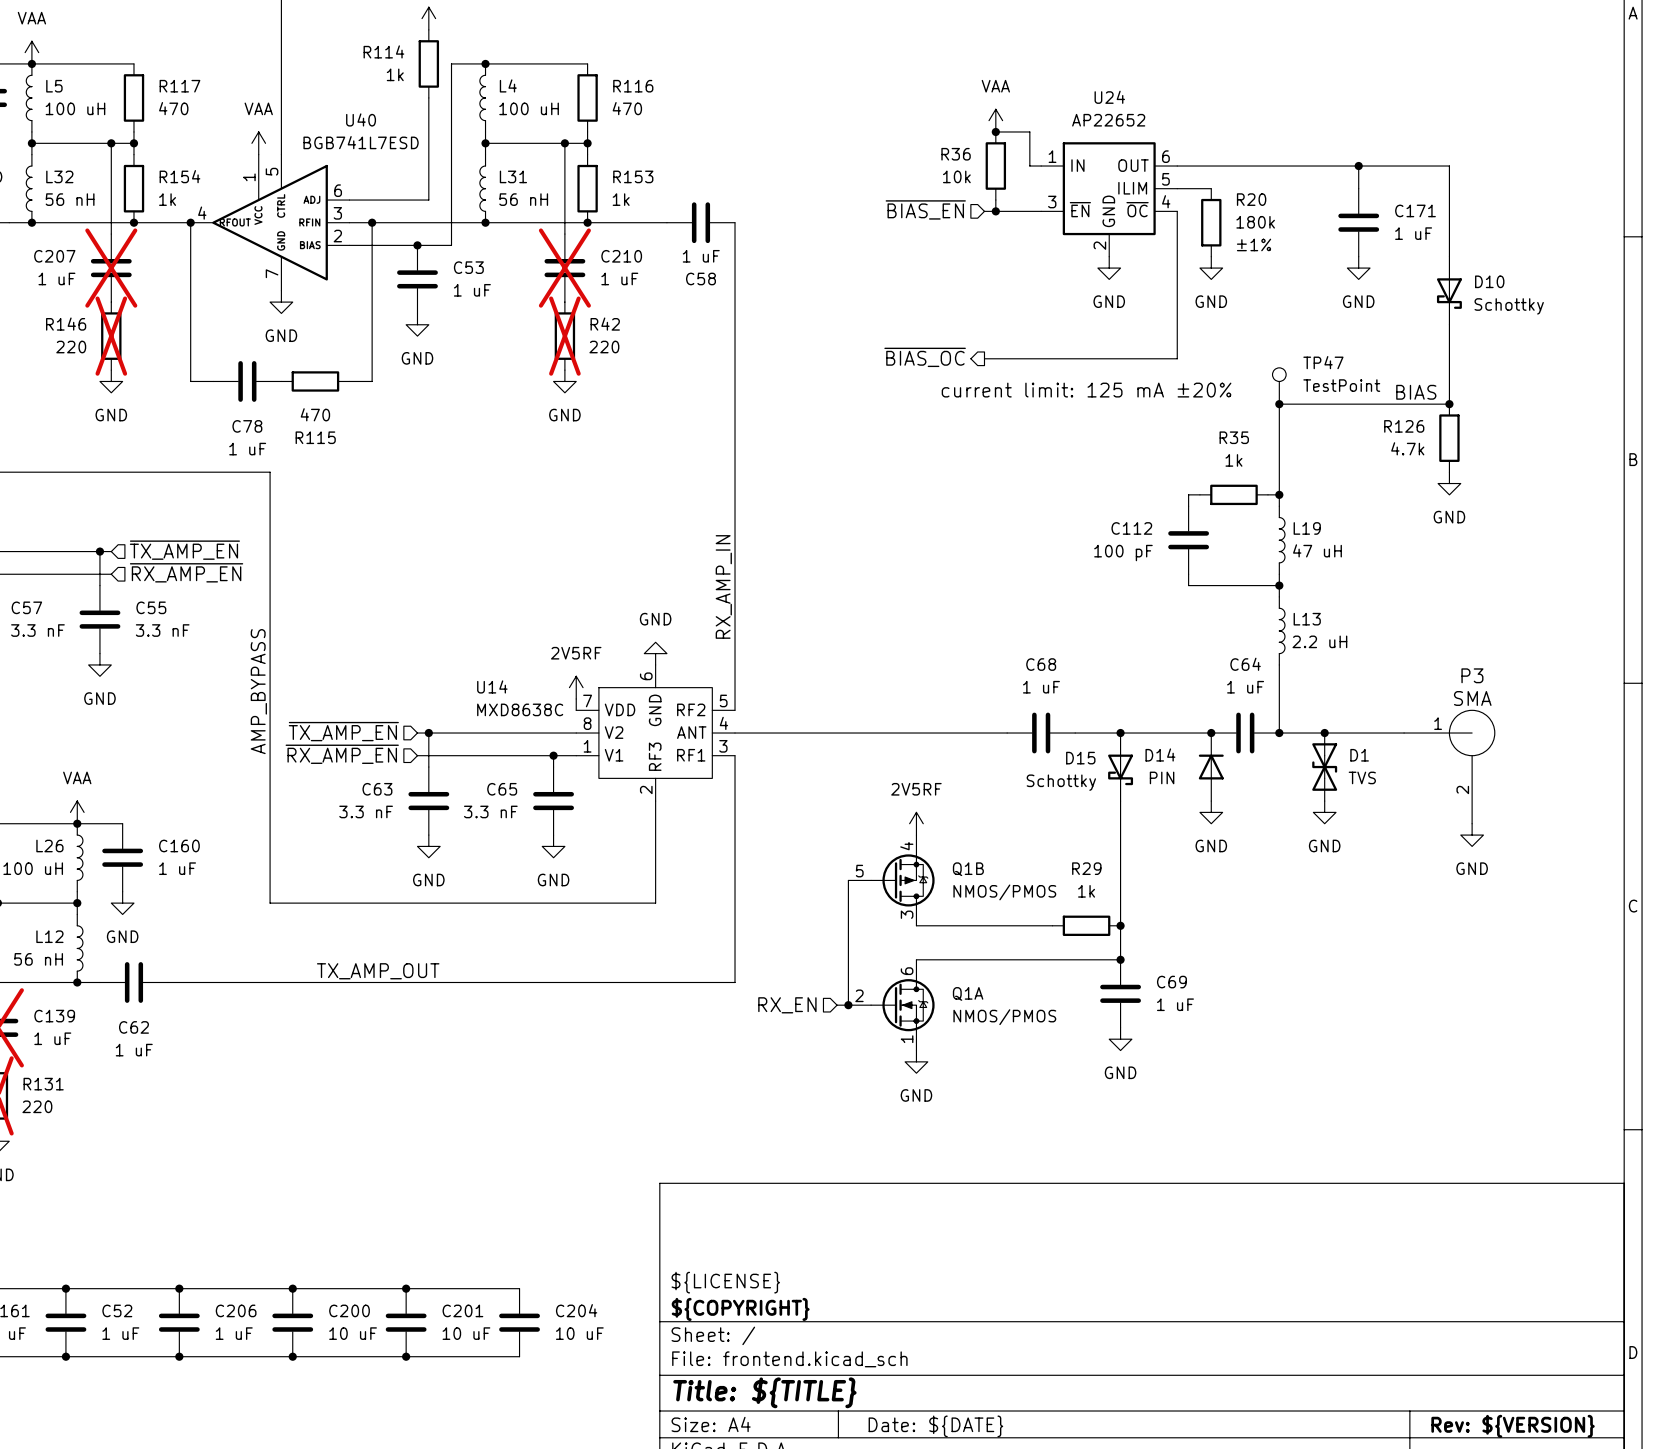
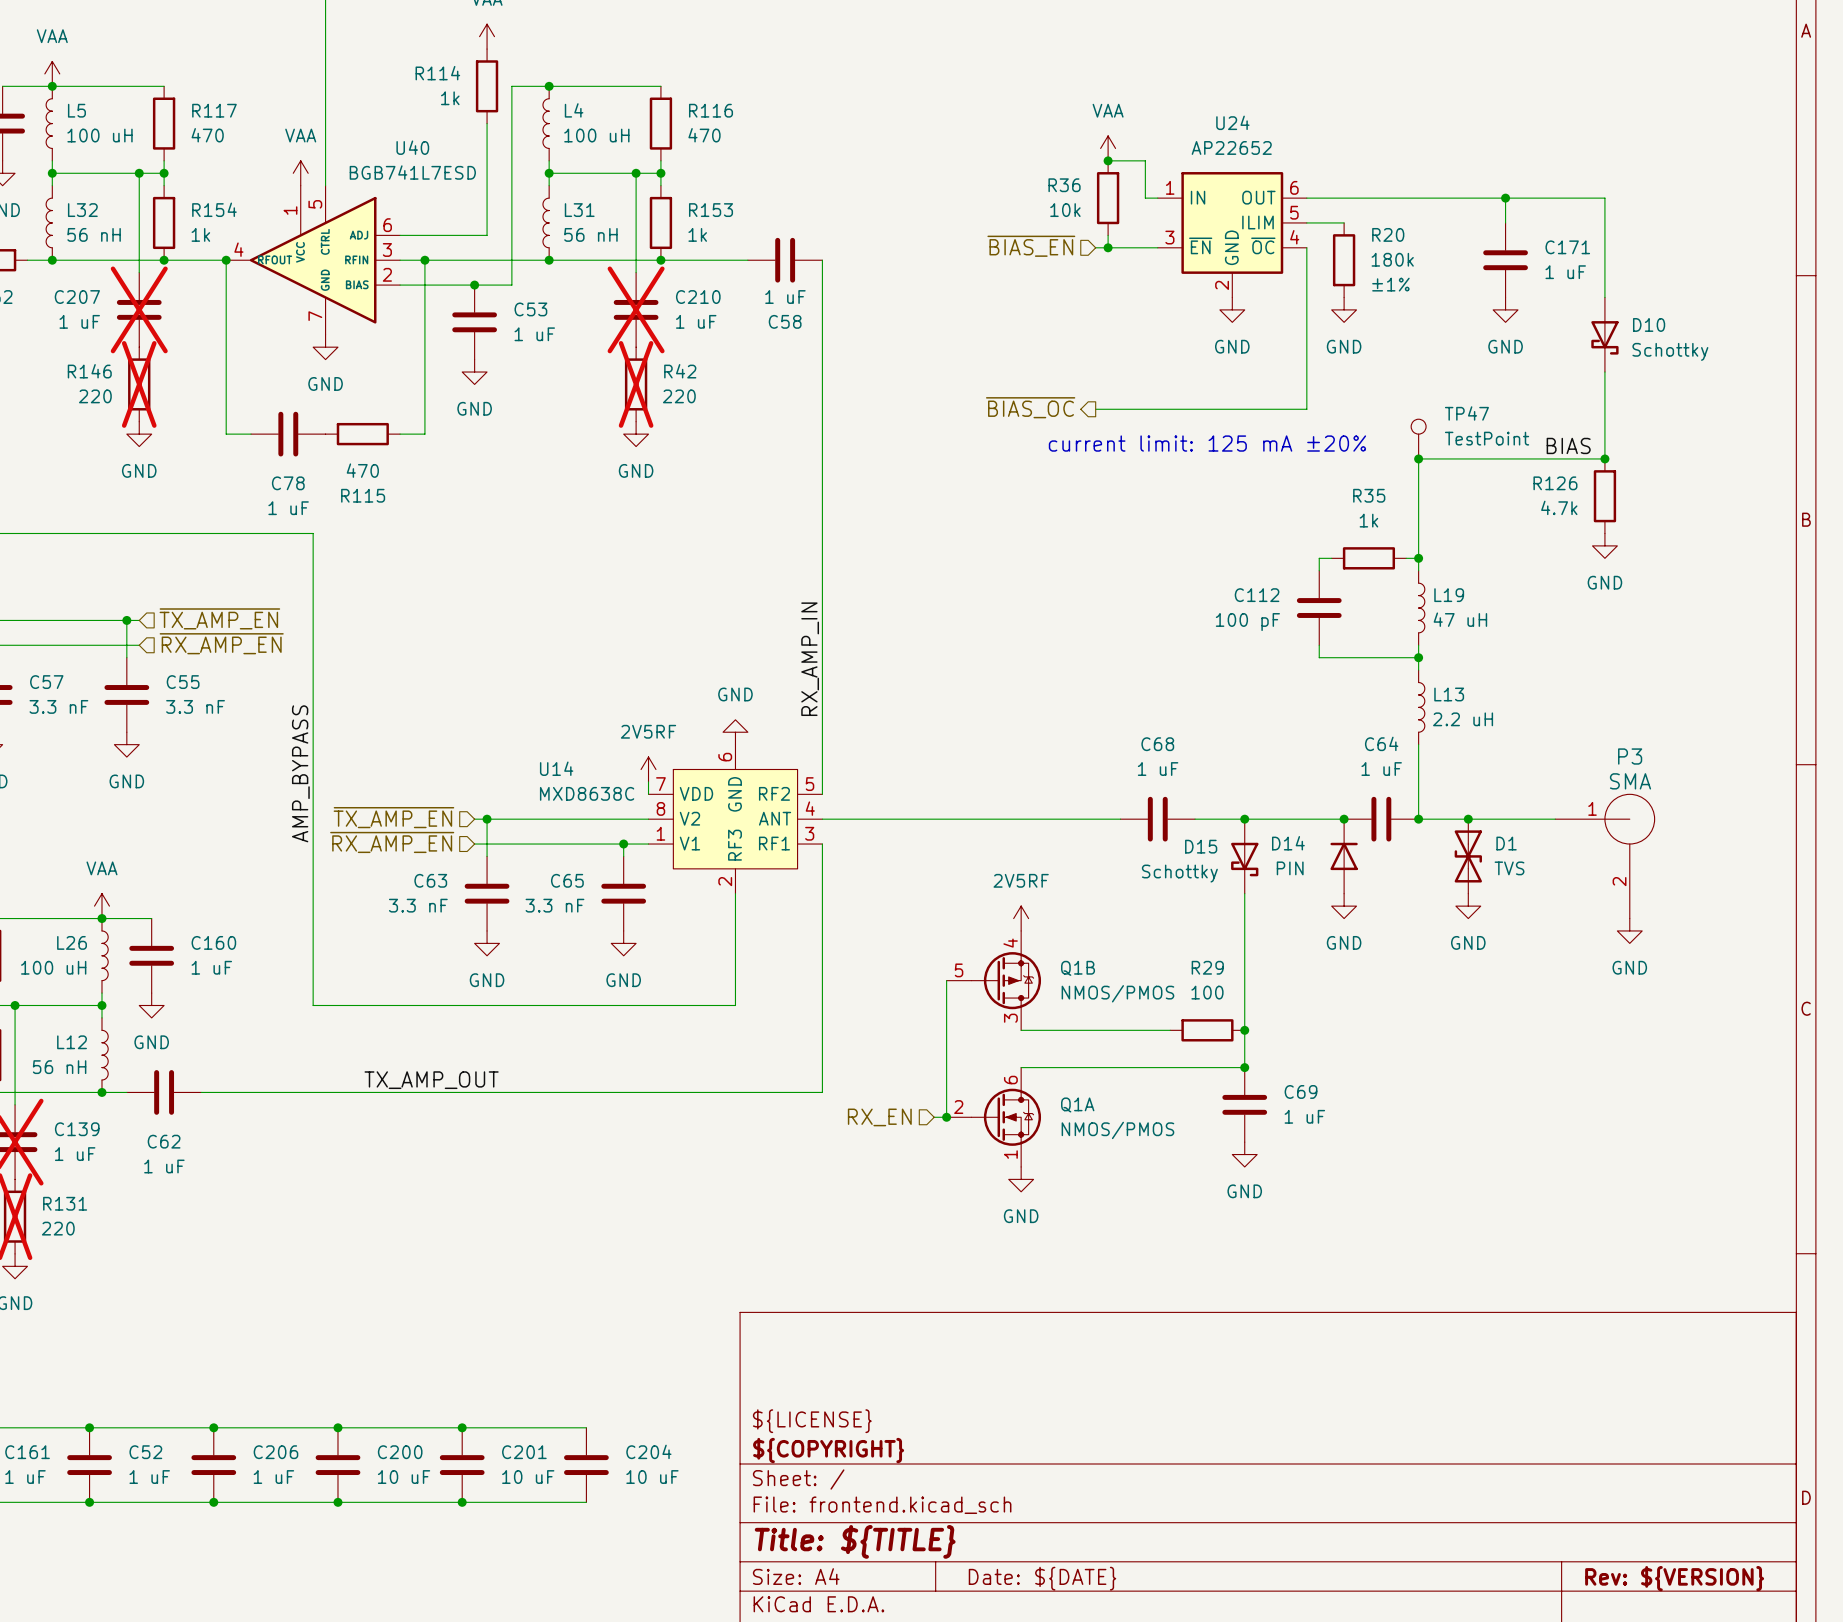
R29 value: 1k (1086, 891) -> 100 (1207, 992)

